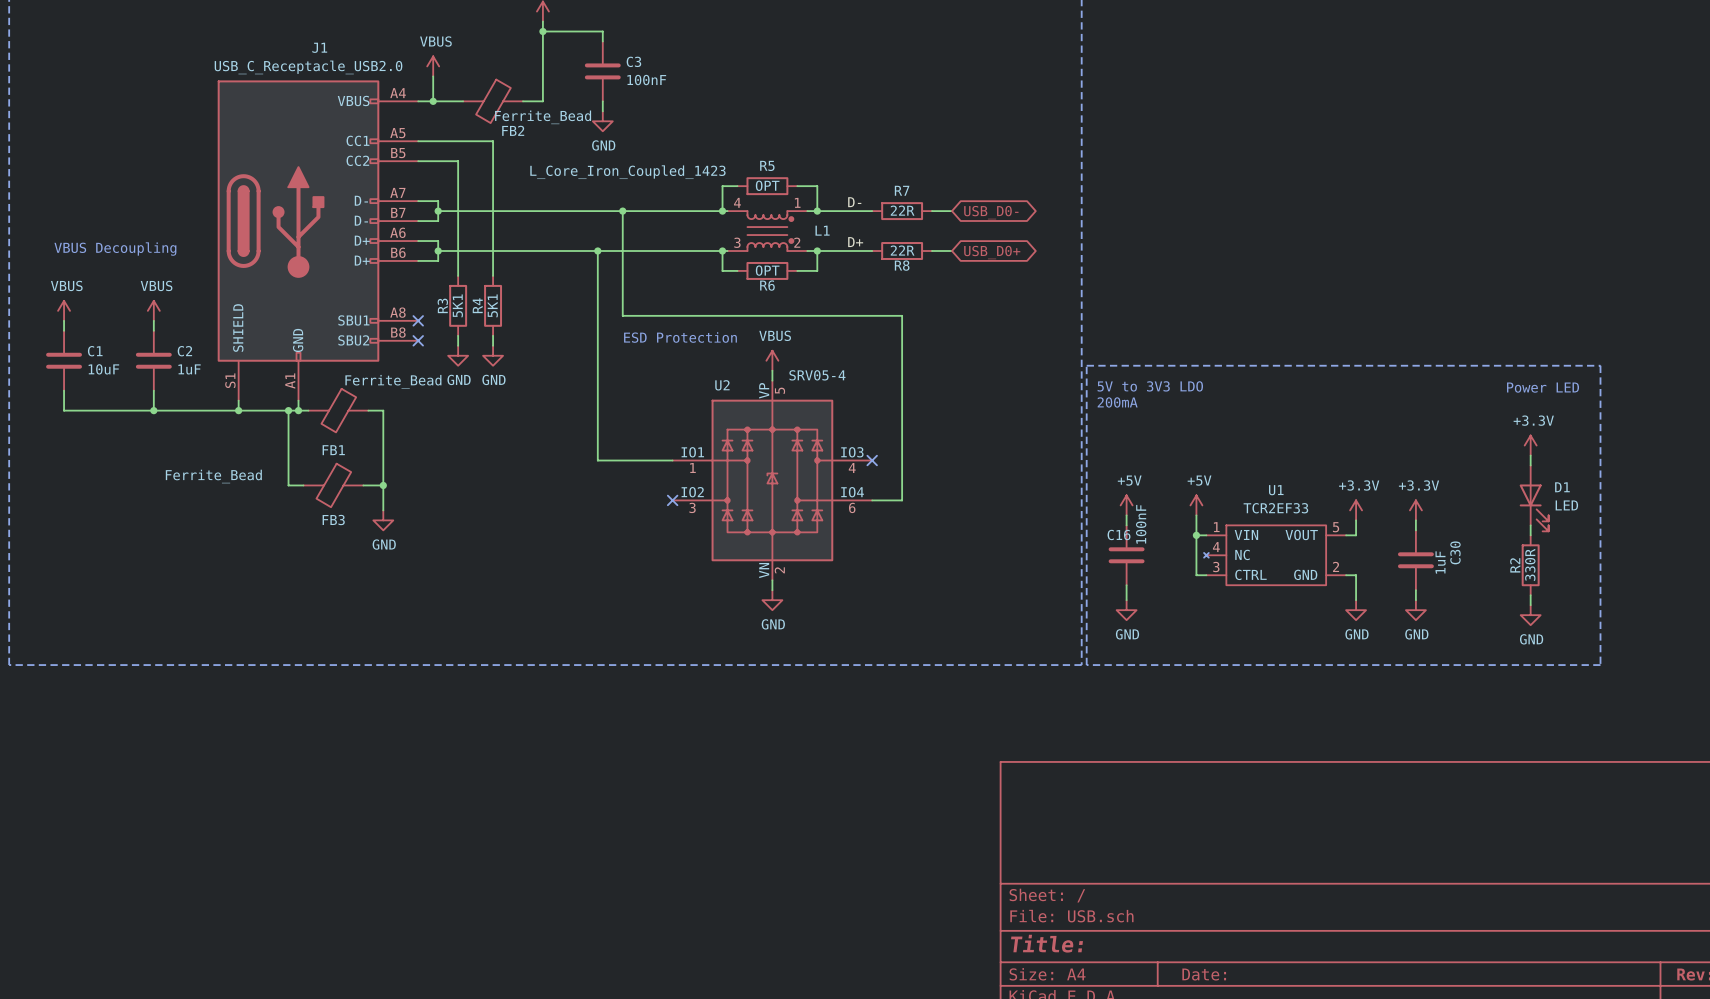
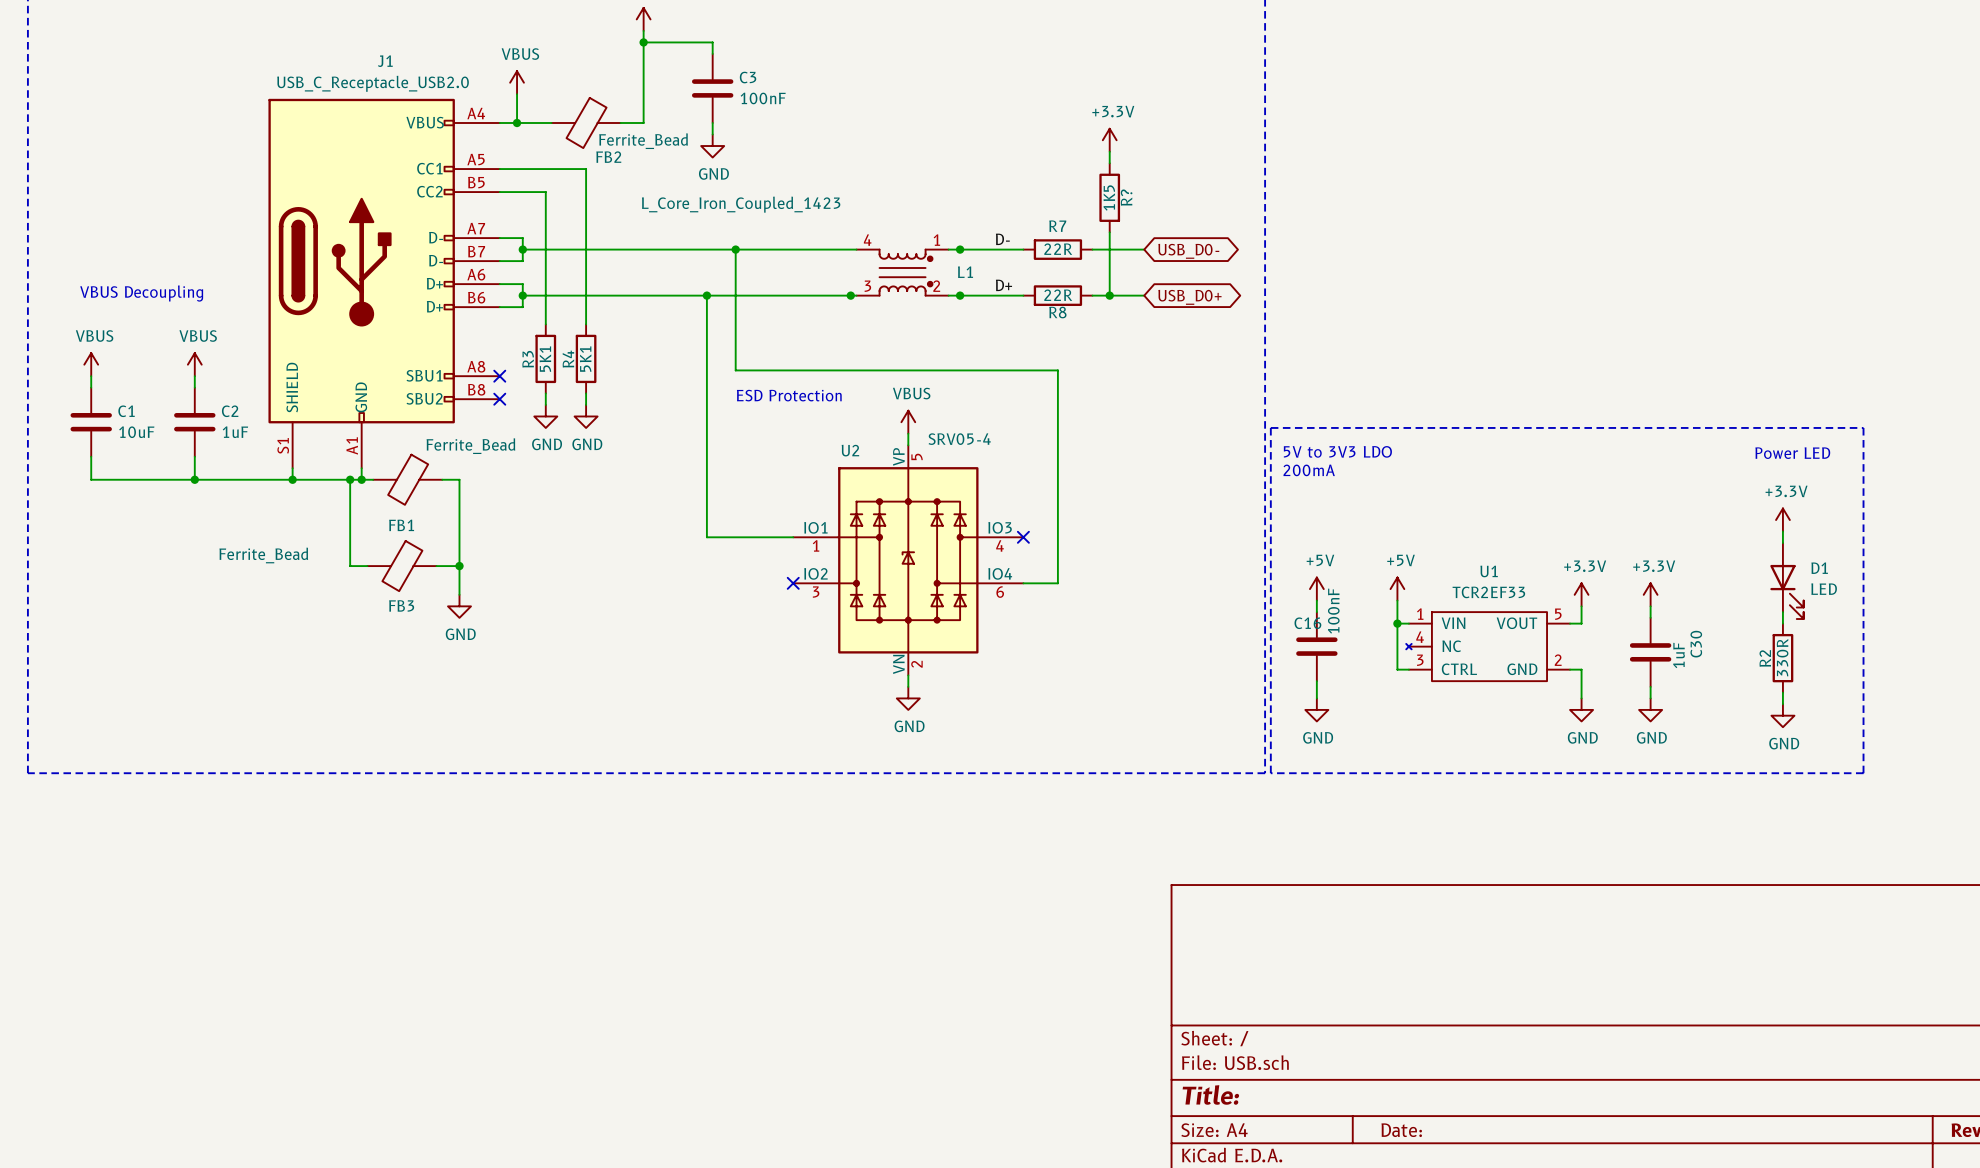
power symbol: none -> +3.3V (1109, 140)
wire: none -> (1109, 151) (1109, 163)
R?: none -> 1K5 (1109, 197)
wire: (737, 186) (722, 186) (722, 211) -> none
R5: OPT (767, 186) -> none
wire: (797, 186) (817, 186) (817, 211) -> none
wire: none -> (1109, 232) (1109, 295)
junction: (722, 211) -> none
wire: none -> (1115, 249) (1144, 249)
global label position: USB_D0- (991, 212) -> USB_D0- (1188, 251)
wire: (722, 251) (722, 270) (737, 270) -> none
wire: (817, 251) (817, 270) (797, 270) -> none
junction: none -> (1109, 295)
wire: none -> (1115, 295) (1144, 295)
global label position: USB_D0+ (992, 252) -> USB_D0+ (1189, 297)
R6: OPT (767, 270) -> none

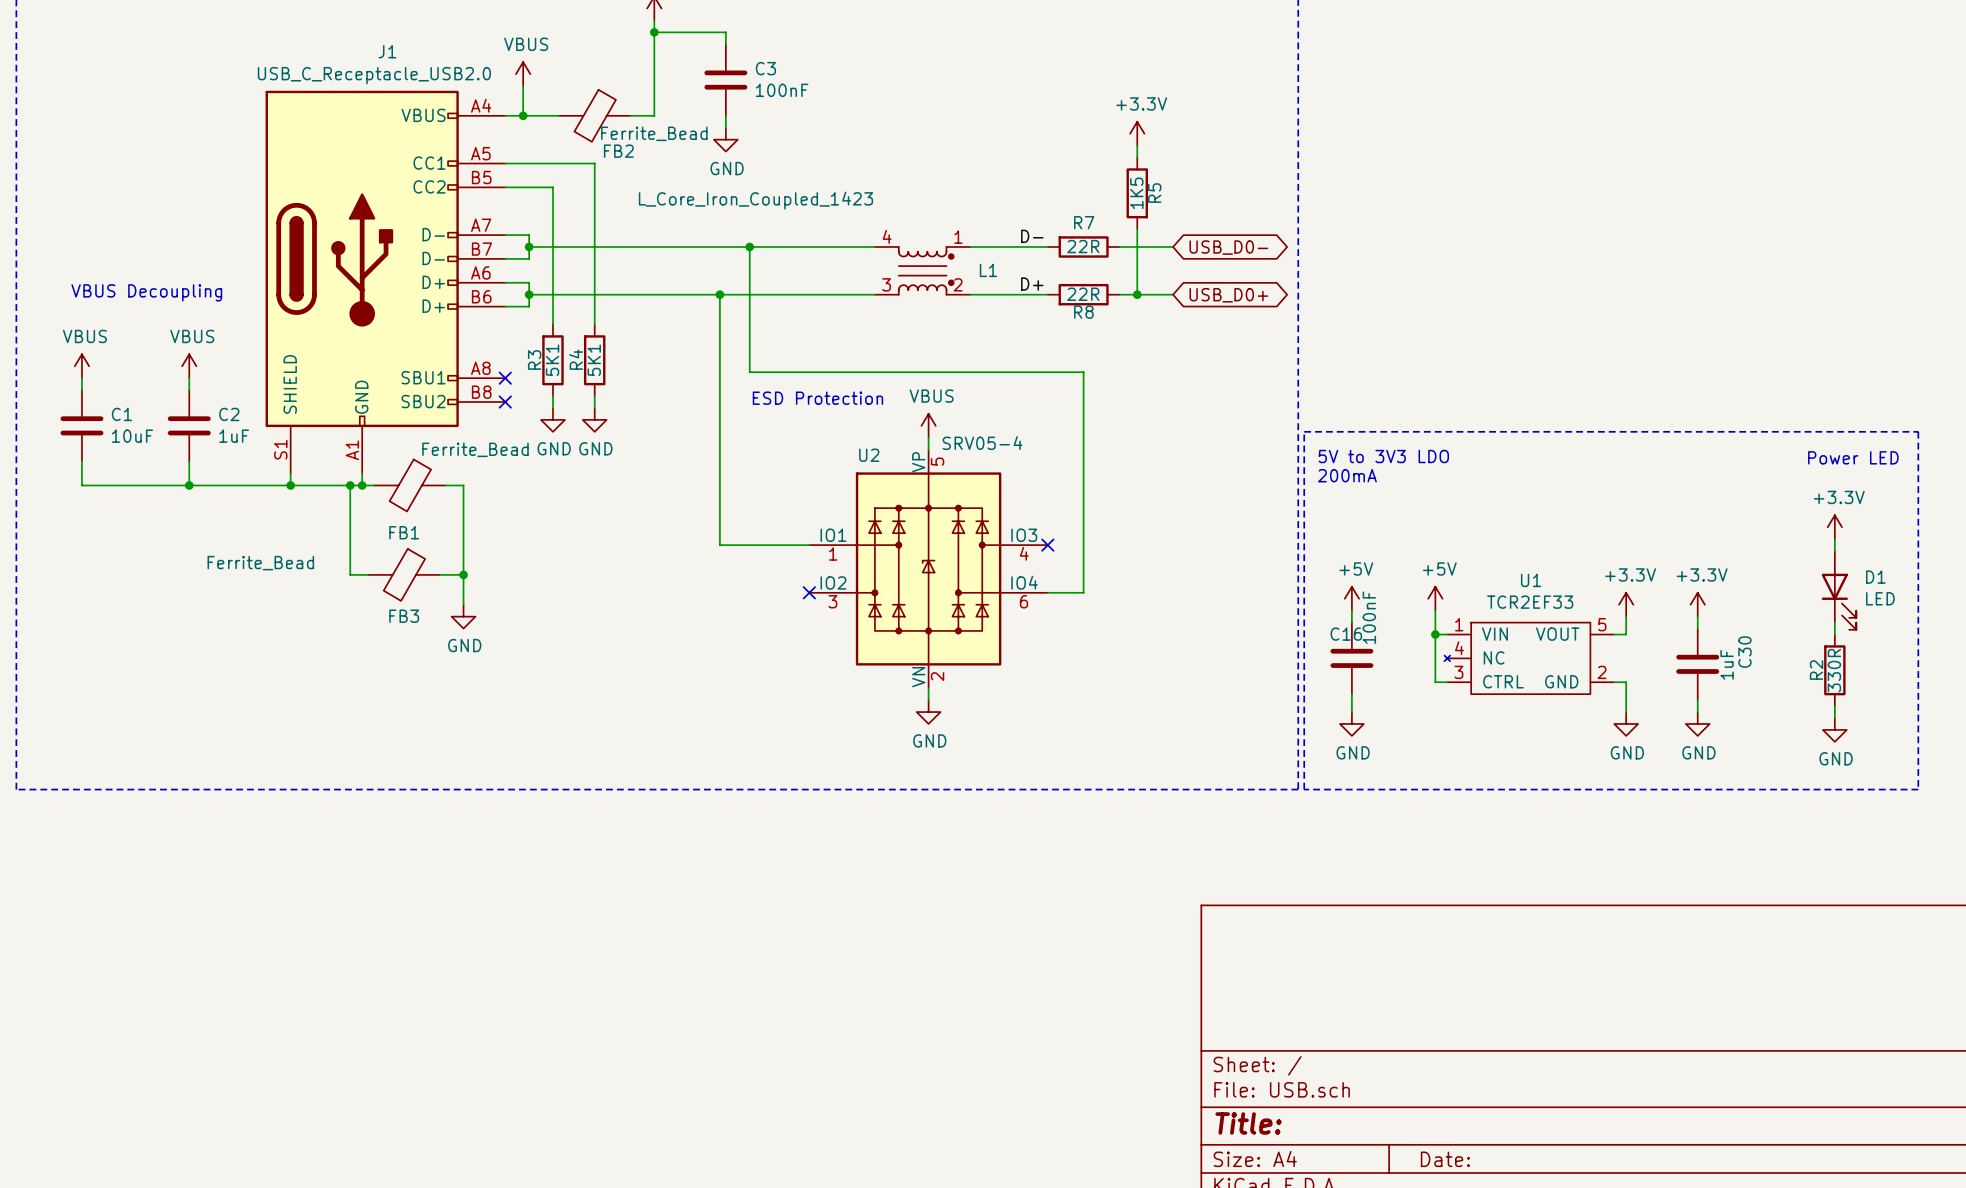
R? name: R? (1126, 197) -> R5 (1154, 193)
junction: (960, 249) -> none
junction: (850, 295) -> none
junction: (960, 295) -> none

